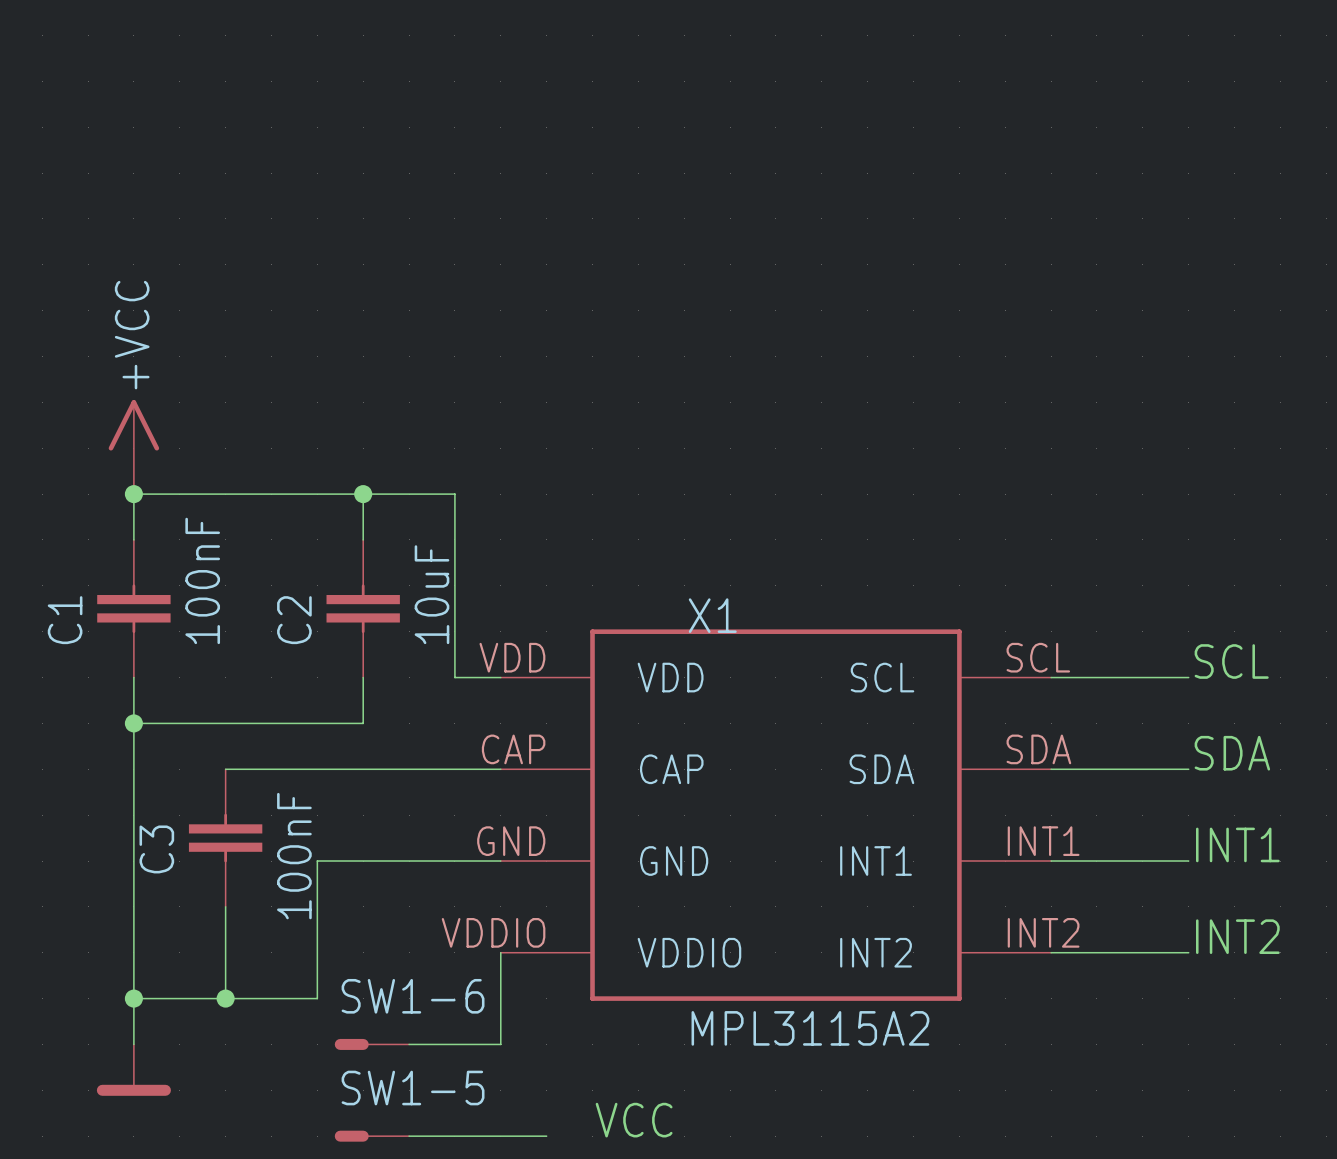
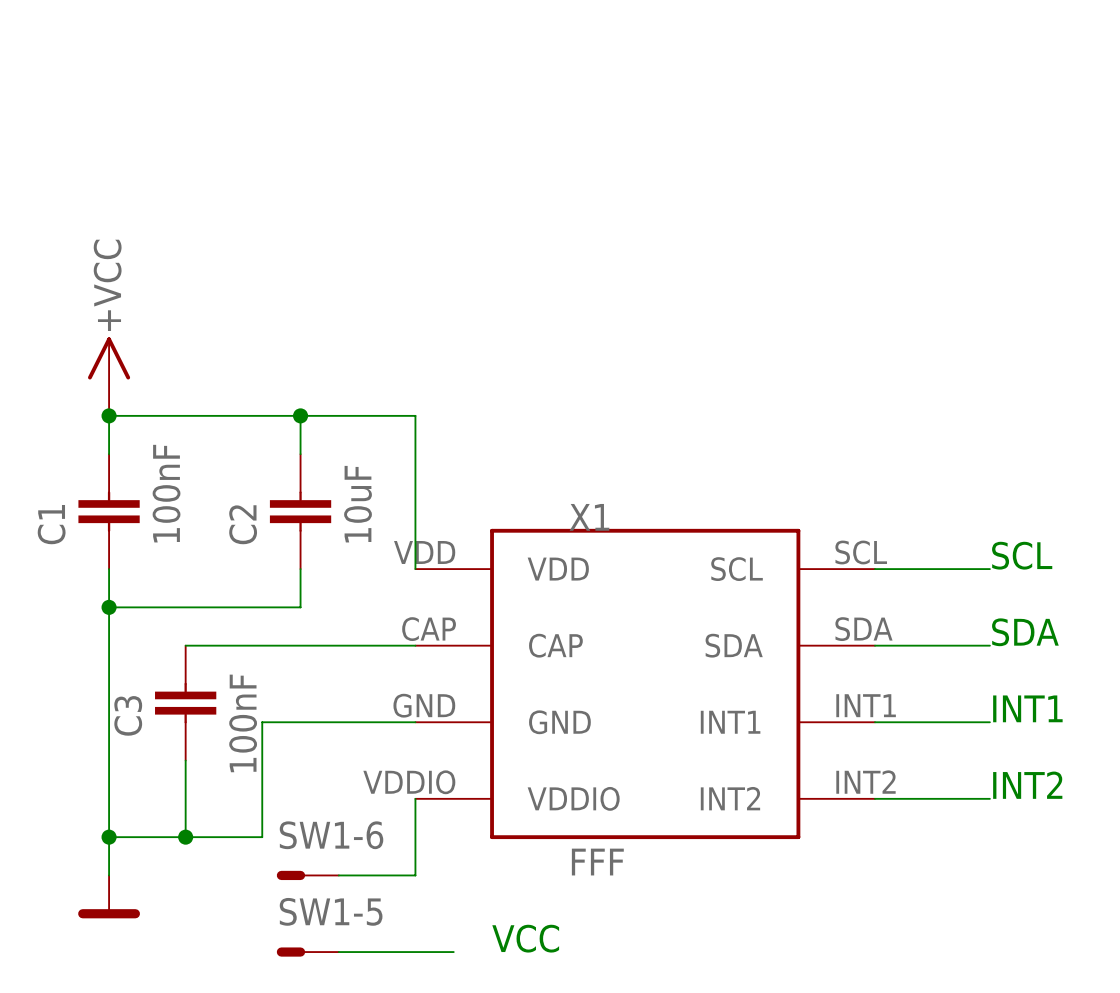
wire: (454, 494) (454, 677) (500, 677) -> (377, 415) (415, 415) (415, 569)
X1 value: MPL3115A2 (810, 1028) -> FFF (597, 862)

